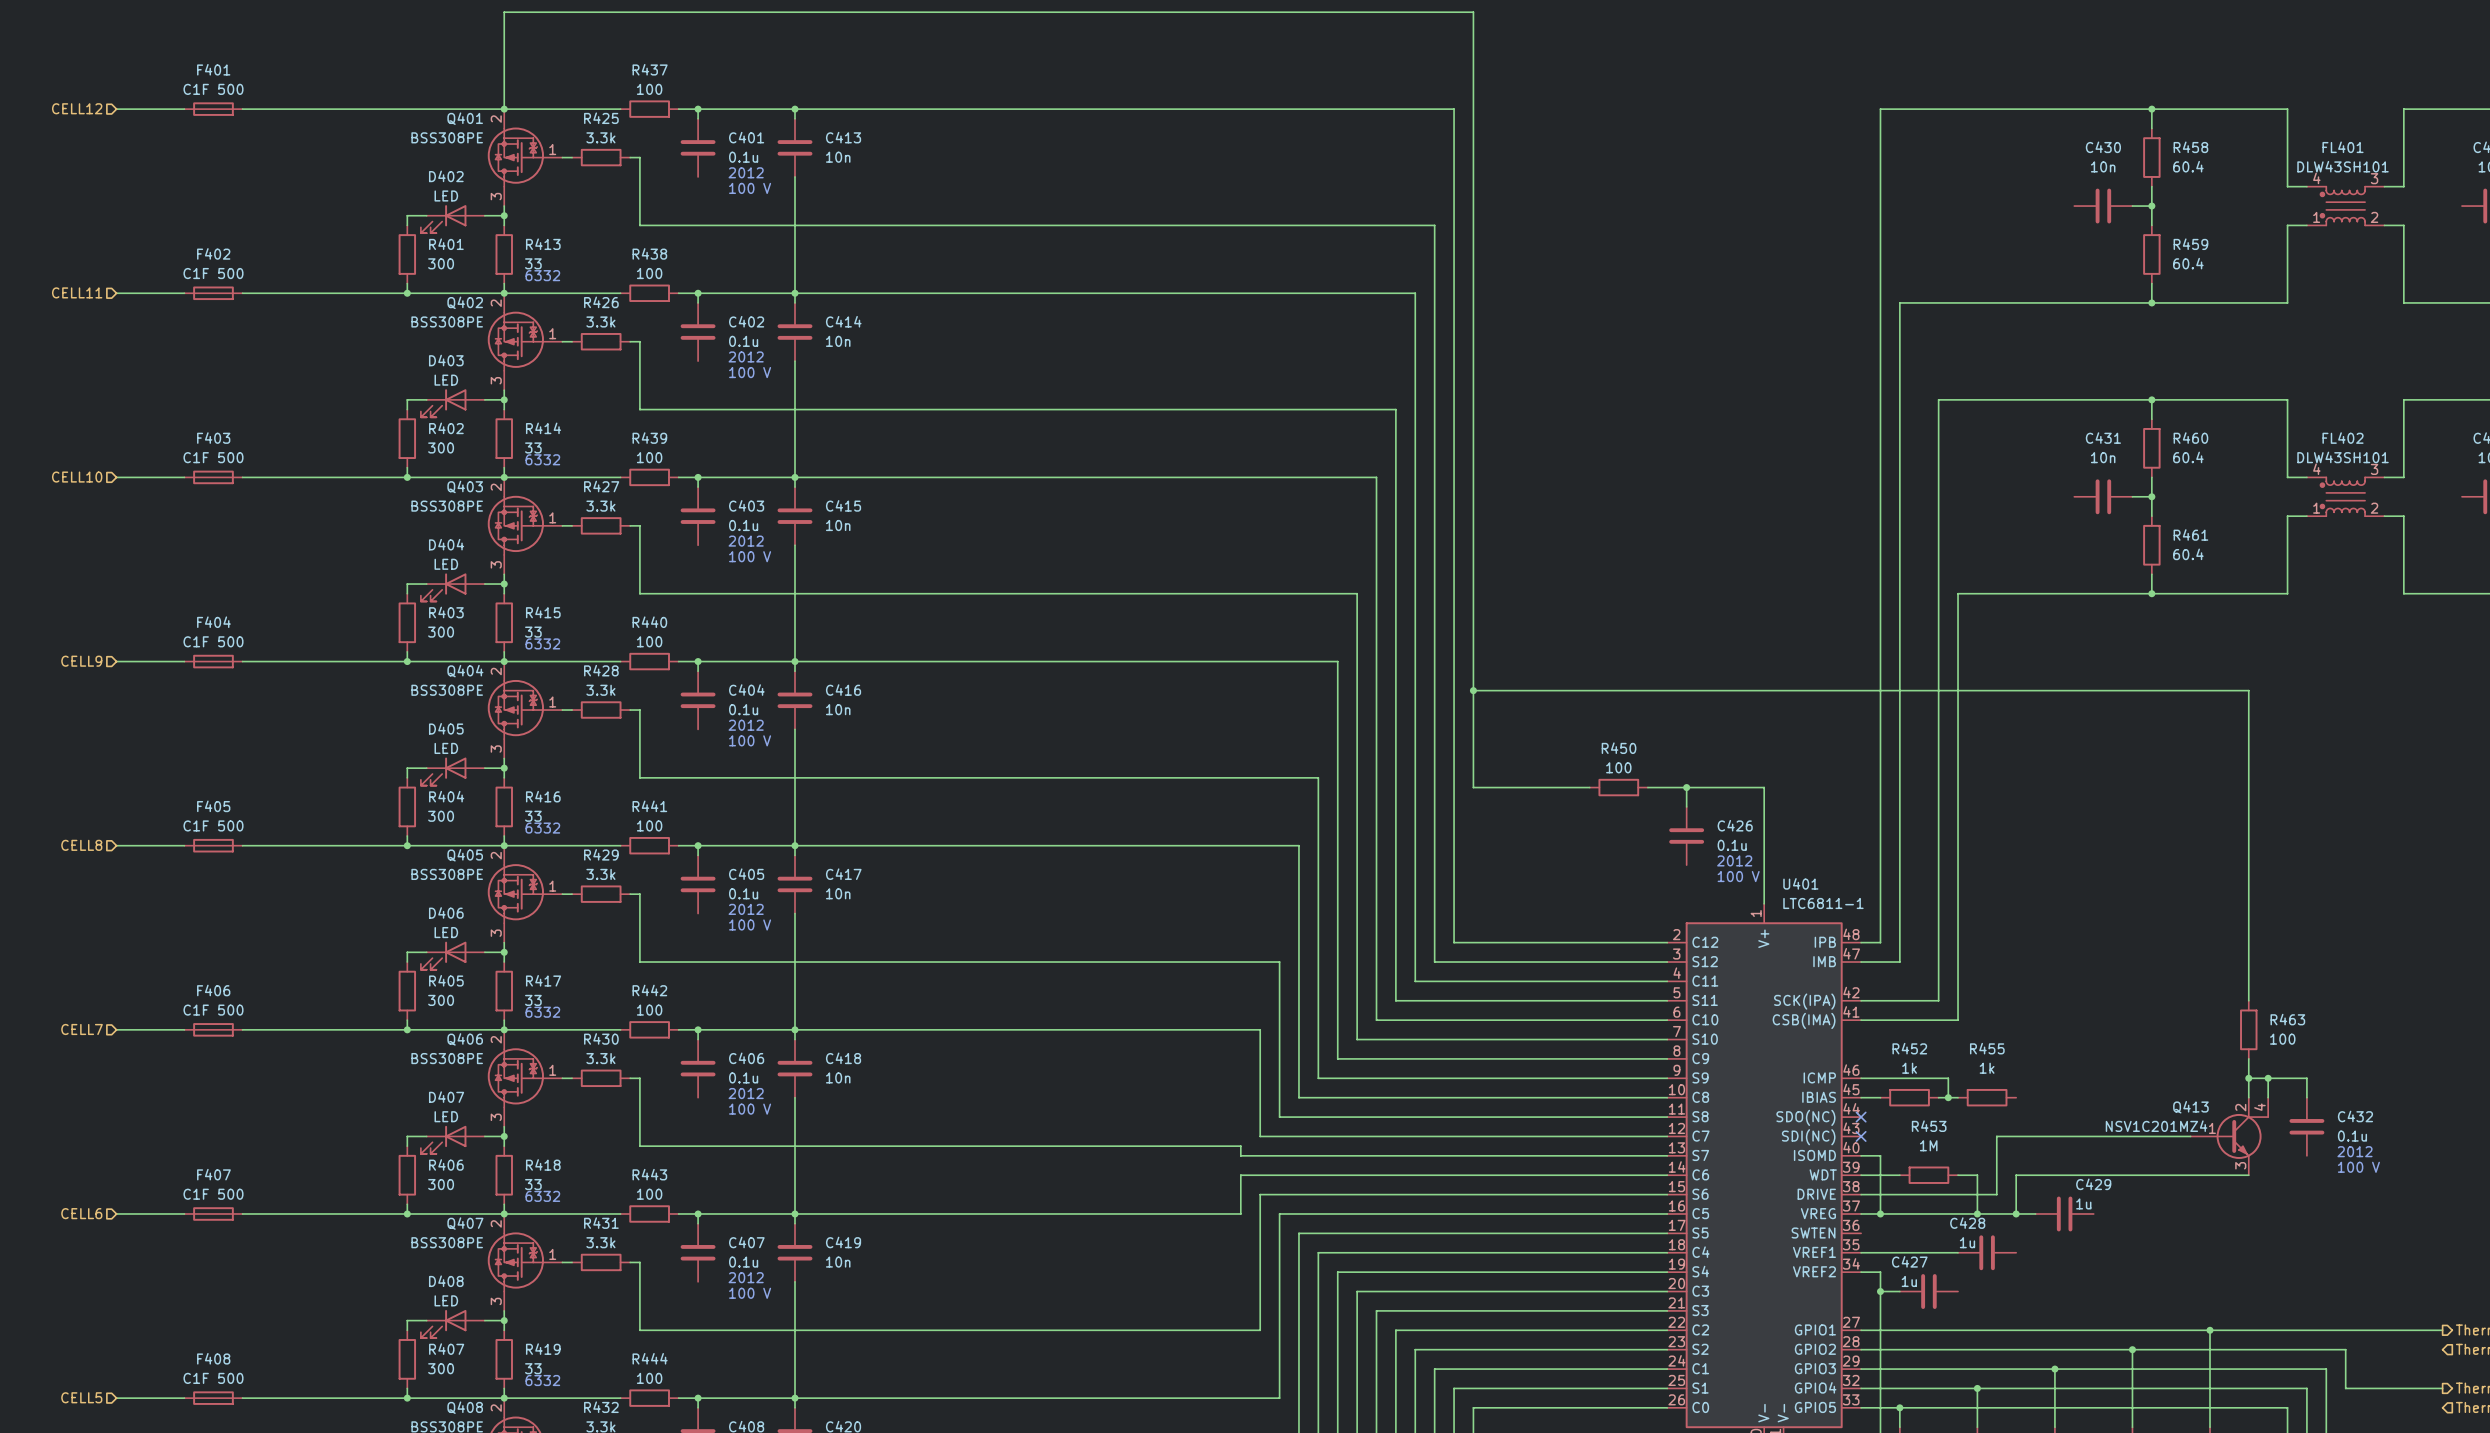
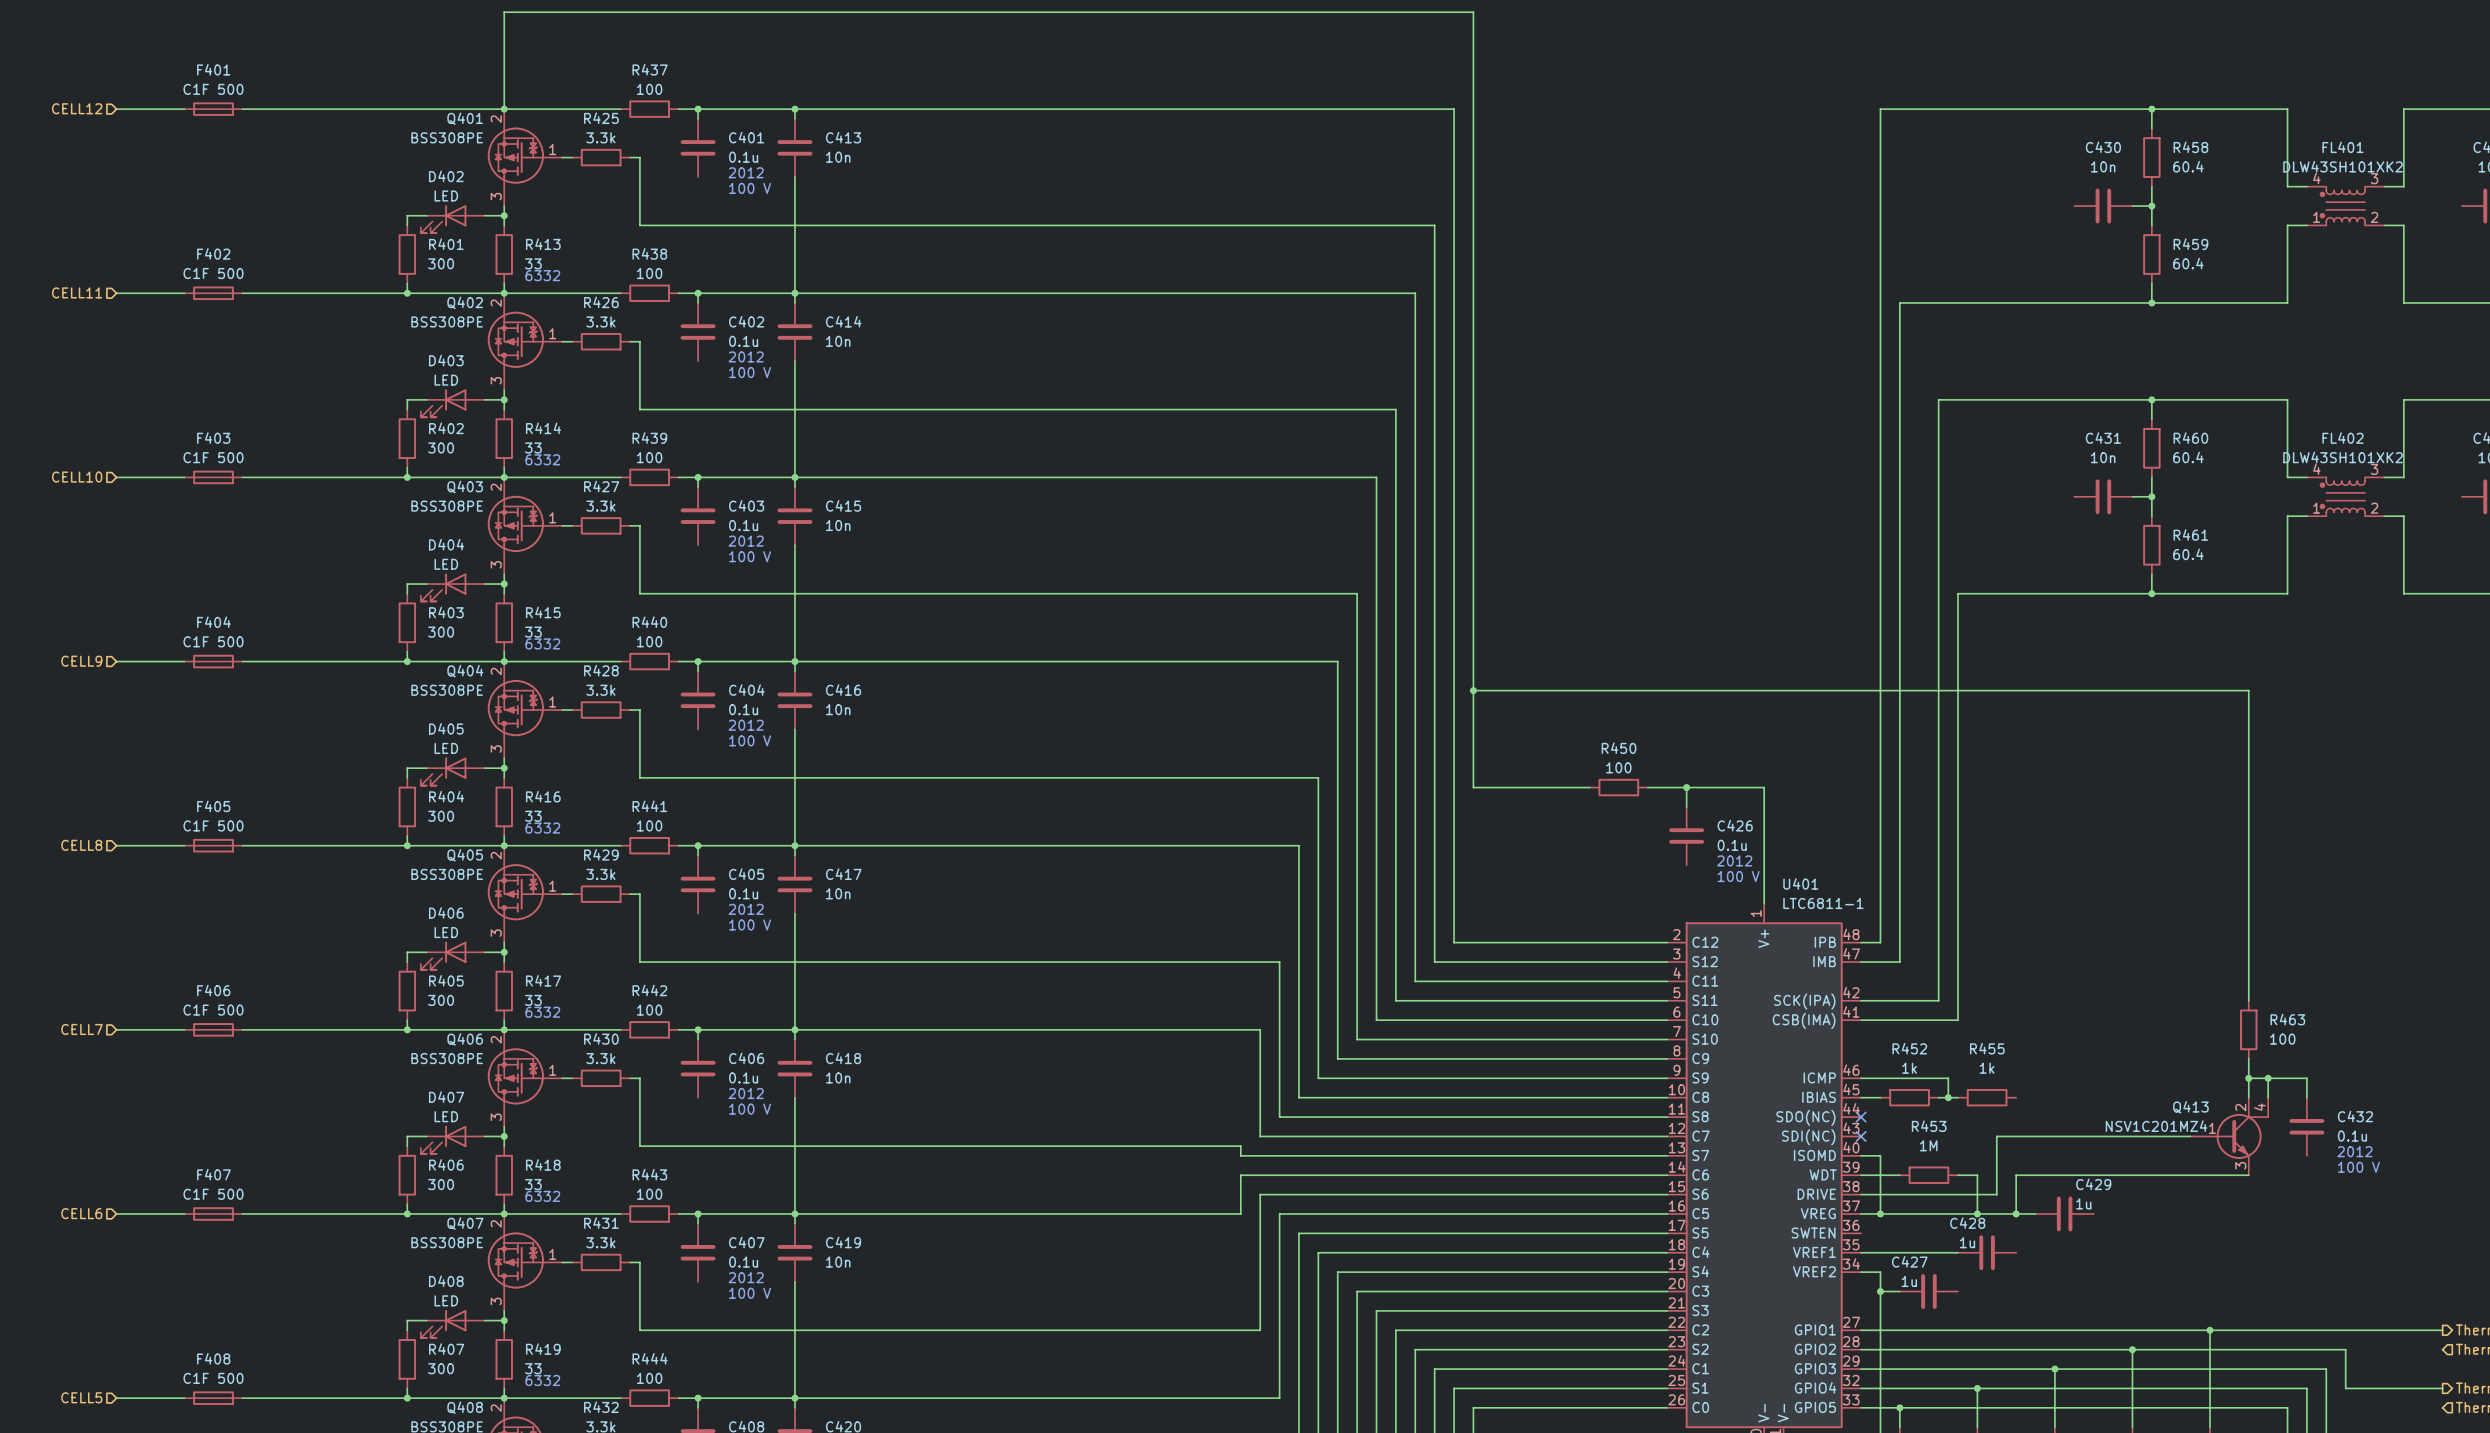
FL401 value: DLW43SH101 (2343, 166) -> DLW43SH101XK2 (2343, 166)
FL402 value: DLW43SH101 (2343, 457) -> DLW43SH101XK2 (2343, 457)

